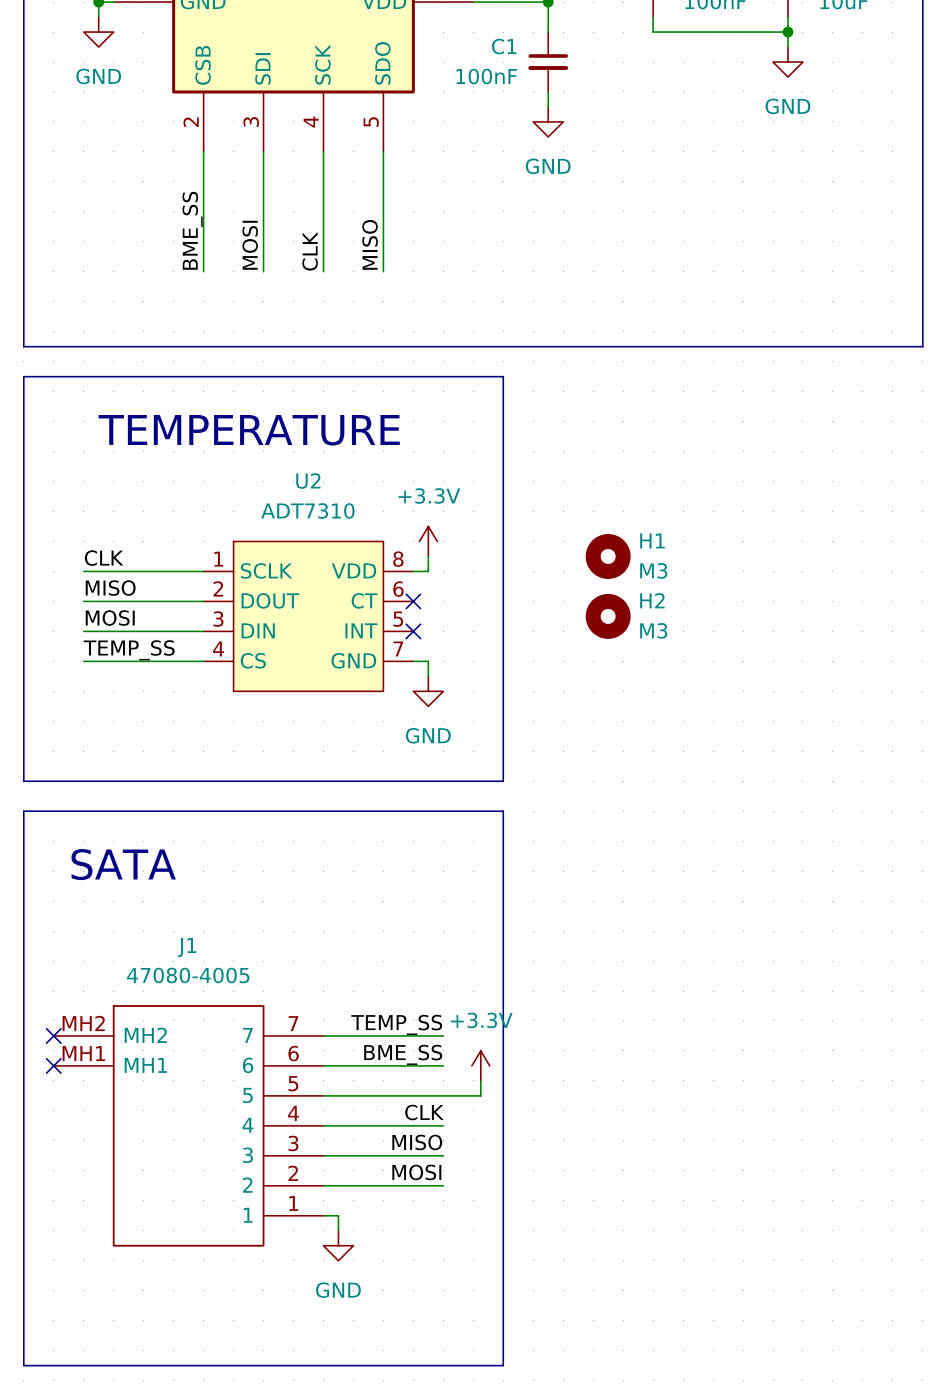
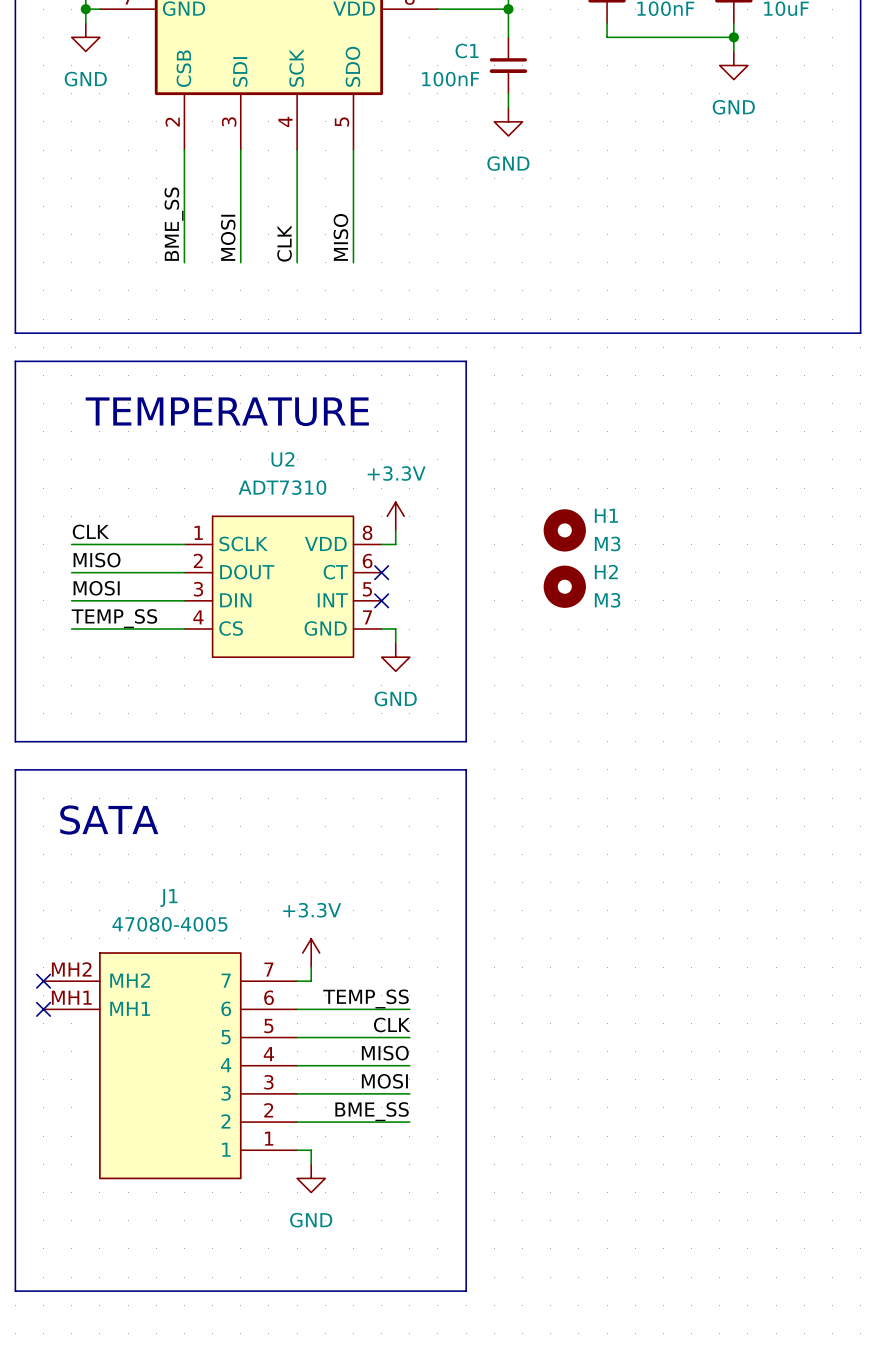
J1 symbol: [53, 1005, 324, 1247] -> [43, 952, 298, 1180]
label: TEMP_SS (396, 1024) -> none
wire: (338, 1035) (443, 1035) -> (311, 981) (311, 967)
label: BME_SS (403, 1054) -> TEMP_SS (365, 998)
power symbol position: +3.3V (480, 1065) -> +3.3V (311, 953)
wire: (480, 1080) (480, 1095) (443, 1095) -> none
label: none -> CLK (392, 1024)
label: CLK (424, 1112) -> MISO (385, 1053)
label: MISO (417, 1142) -> MOSI (384, 1081)
label: MOSI (416, 1172) -> BME_SS (372, 1111)

